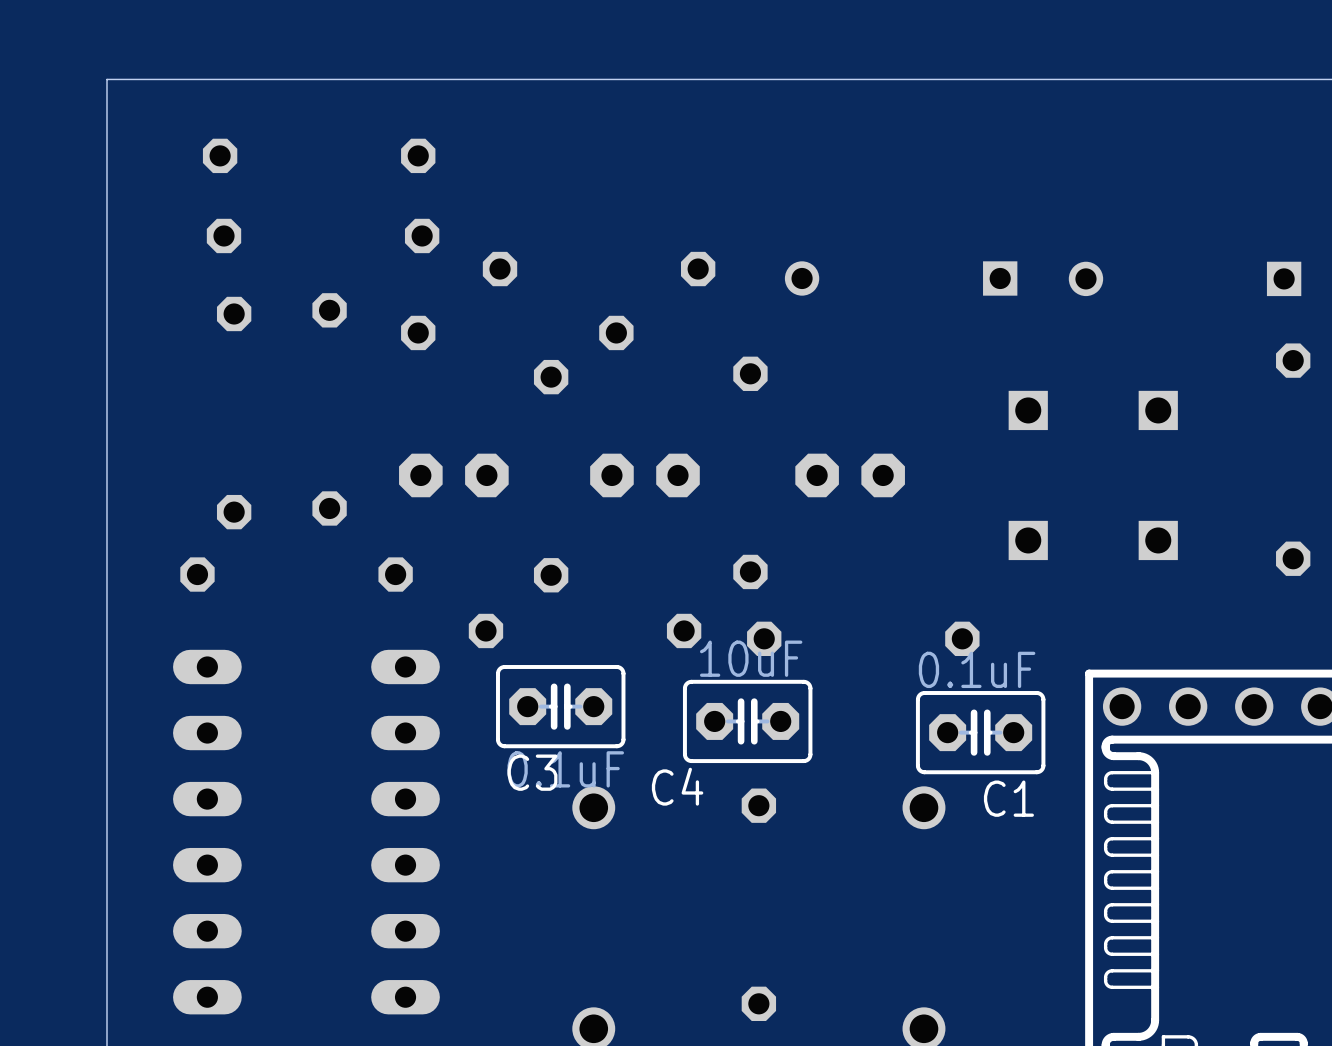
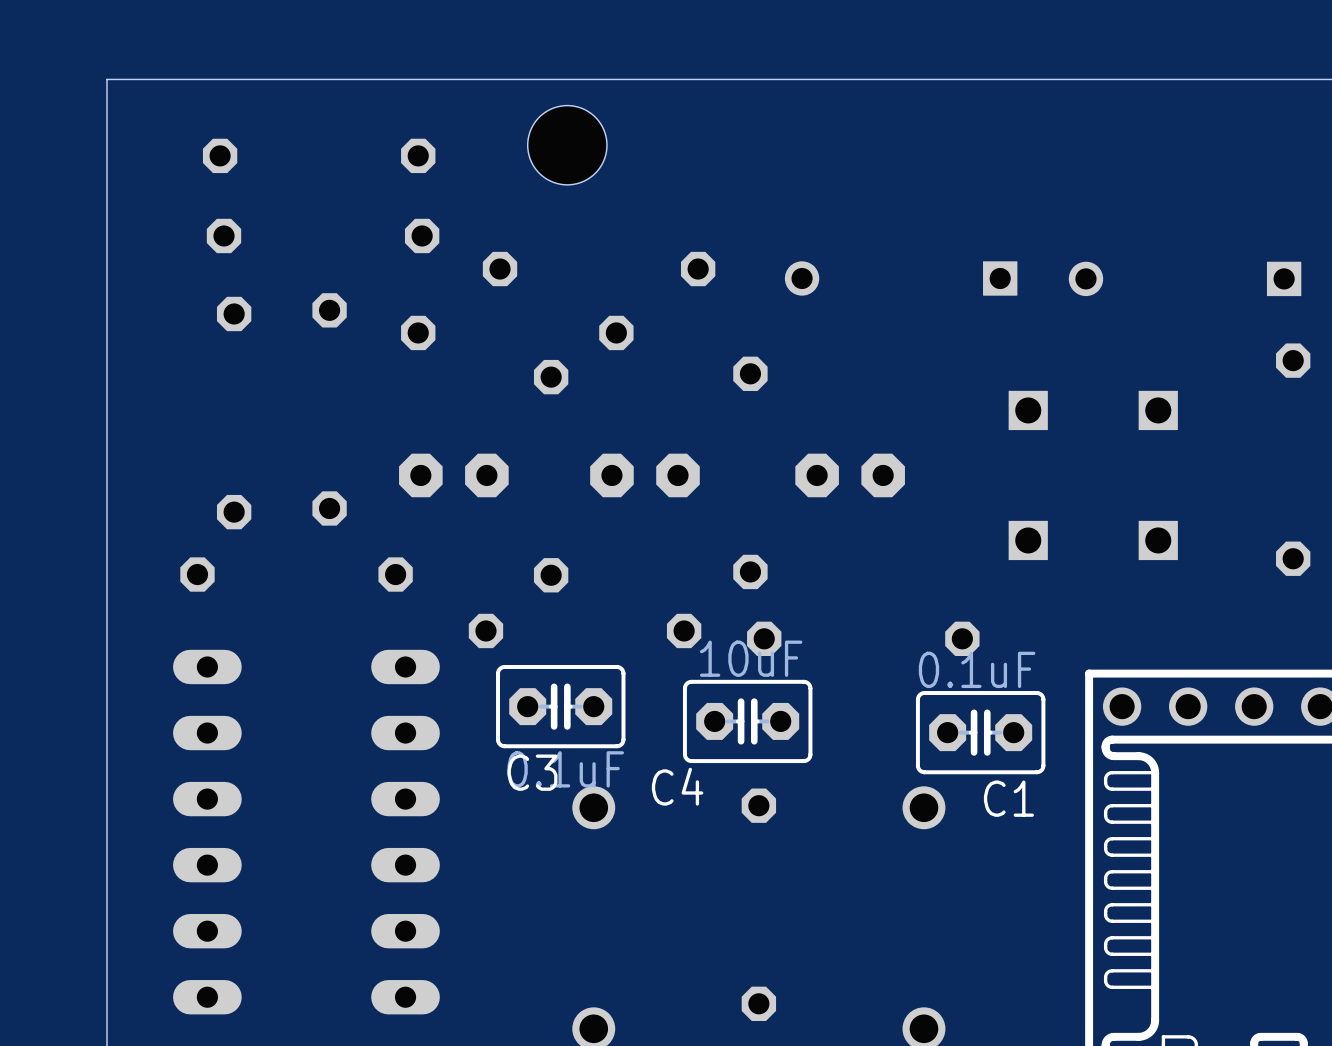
hole: none -> (567, 145)

